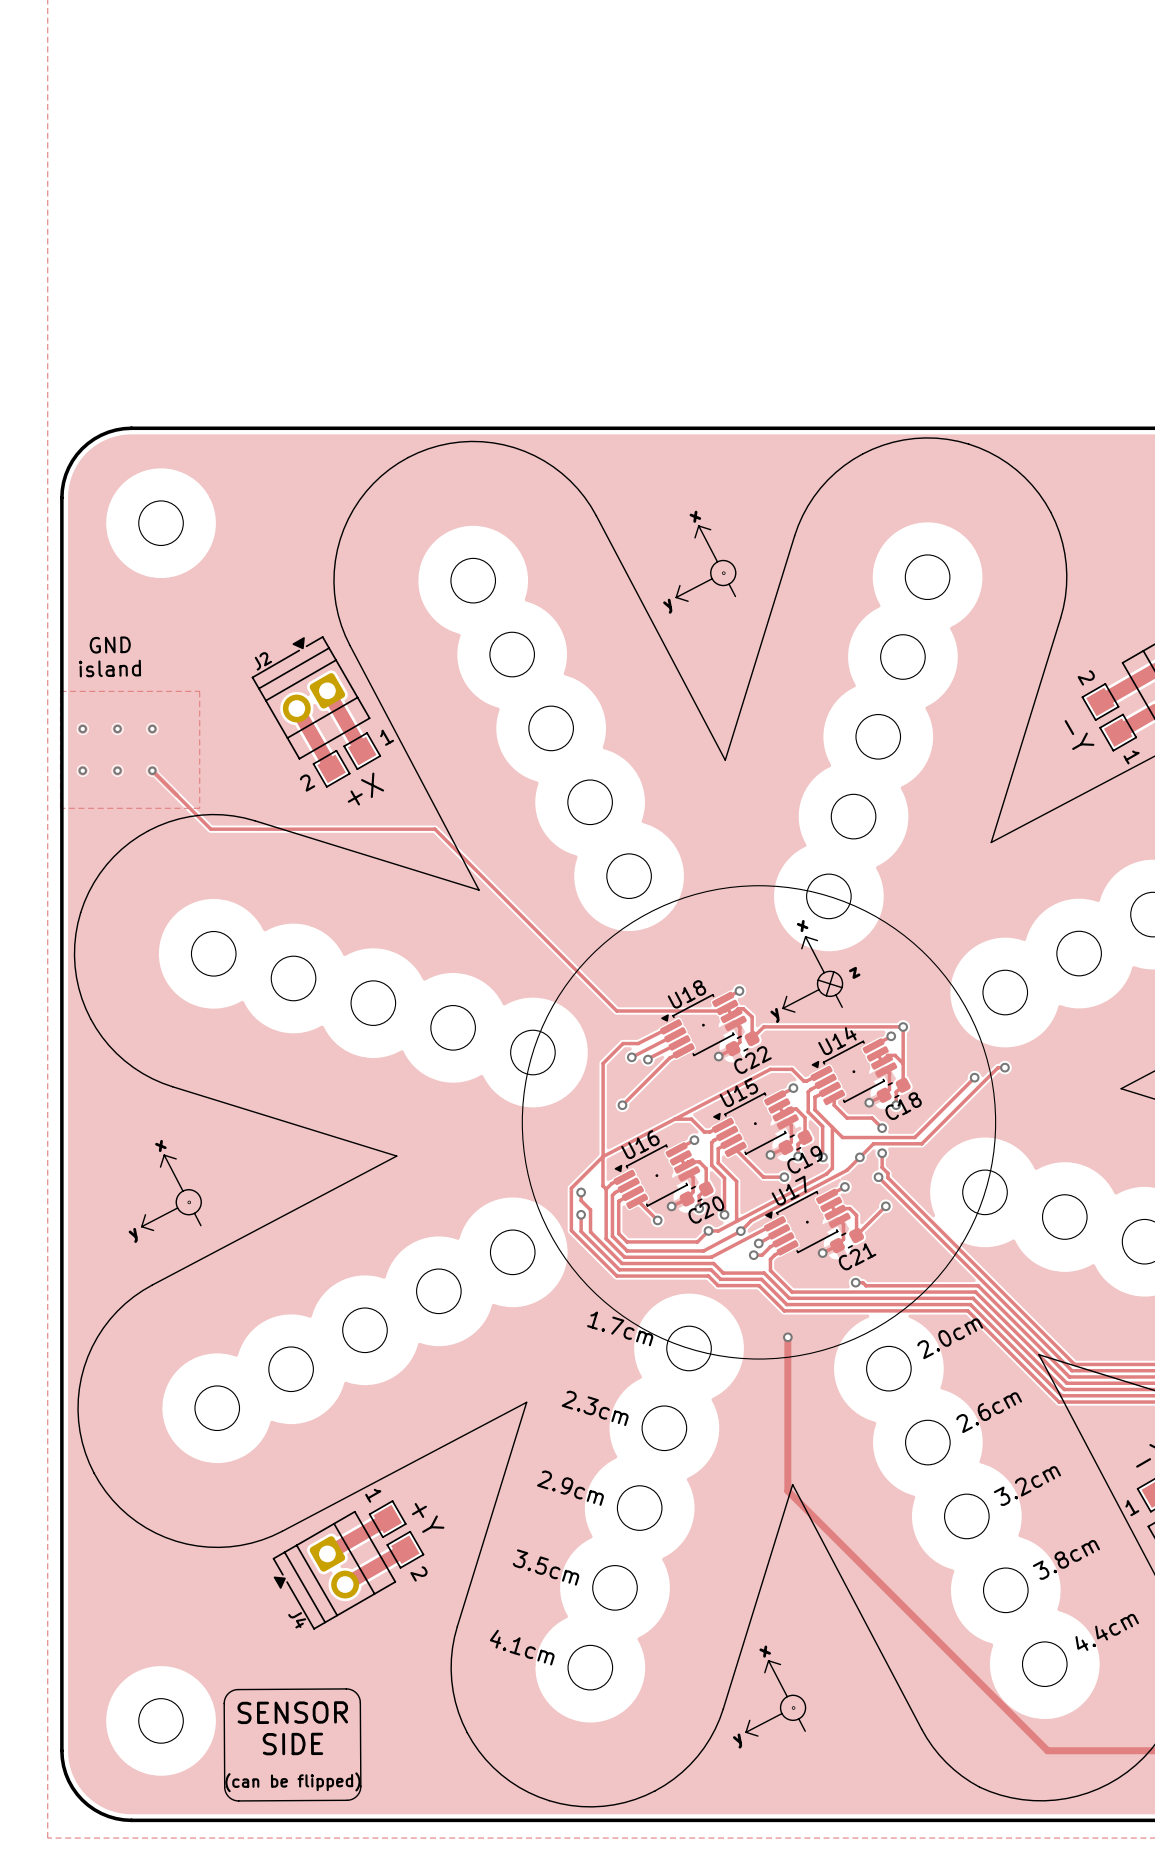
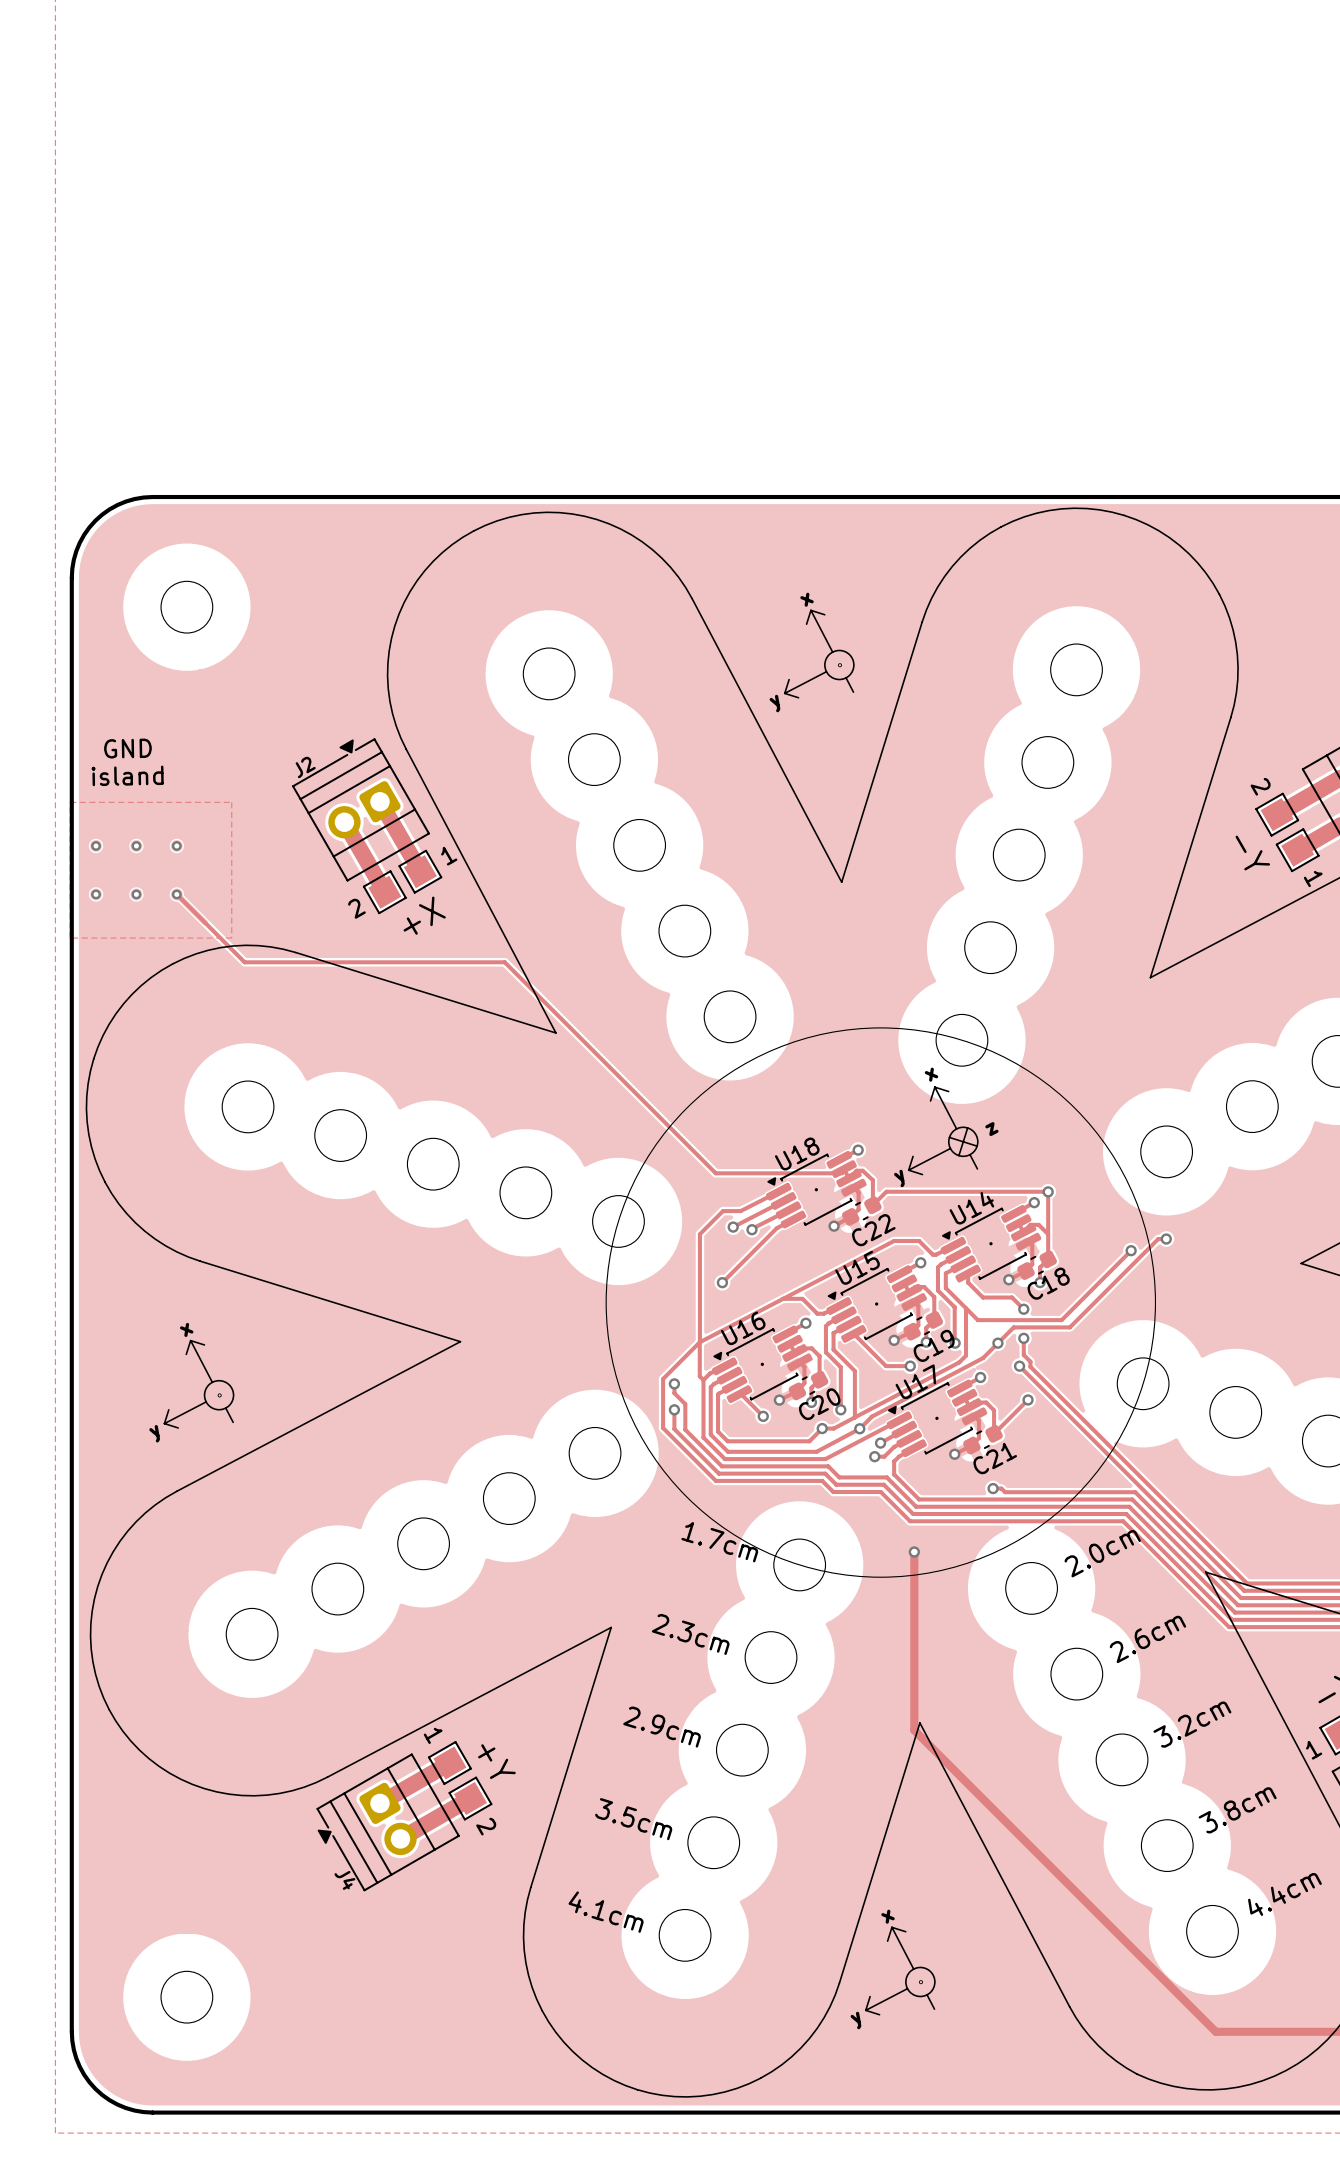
line: (346, 1688) (238, 1689) (228, 1693) (224, 1703) (224, 1787) (228, 1796) (238, 1800) (347, 1800) (356, 1796) (360, 1786) (360, 1700) (356, 1692) (346, 1688) -> none
text: SENSOR (292, 1712) -> none
text: SIDE (292, 1744) -> none
text: (can be flipped) (292, 1782) -> none

